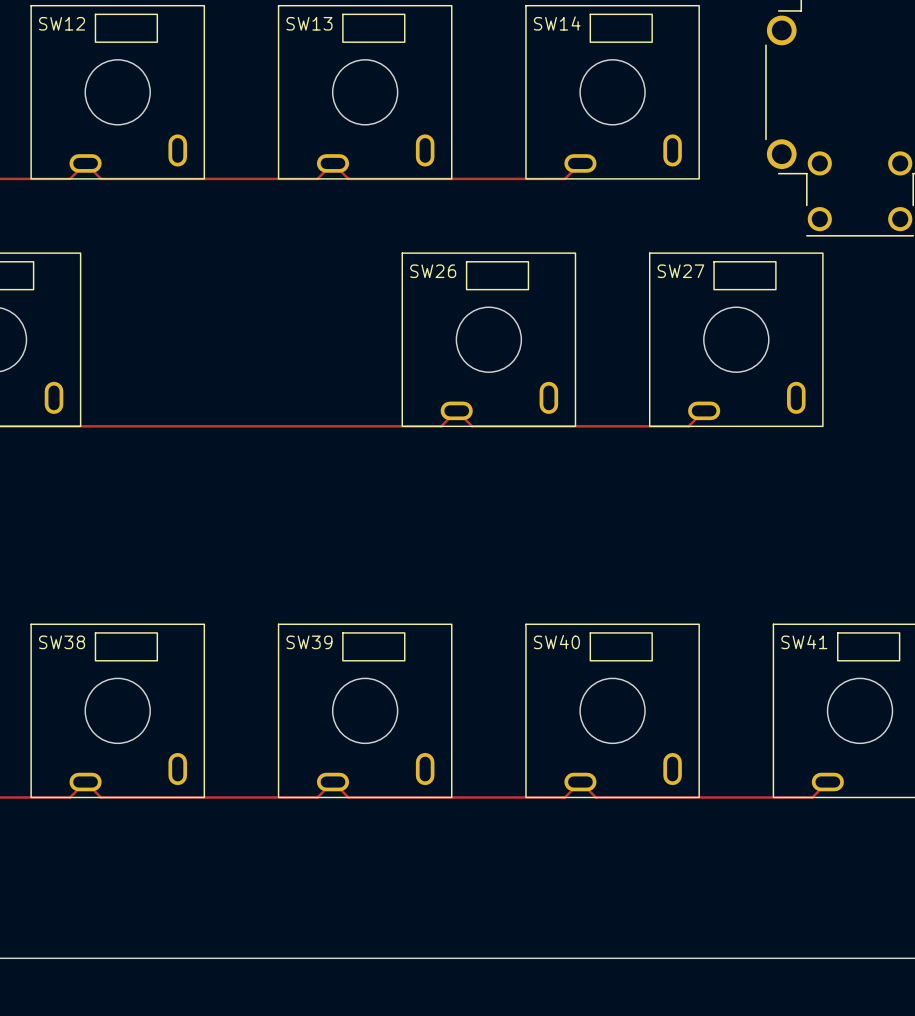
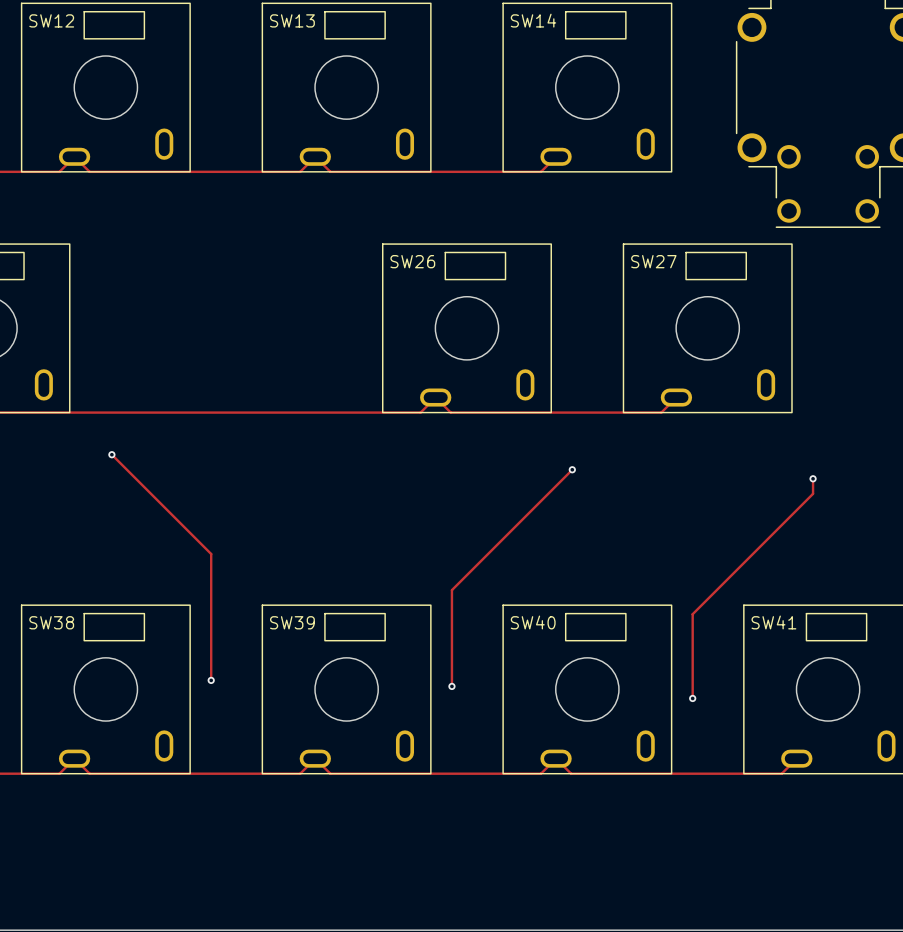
track: none -> (111, 454) (211, 554) (211, 680)
via: none -> (111, 454)
track: none -> (572, 469) (451, 590) (451, 686)
via: none -> (572, 469)
track: none -> (813, 478) (813, 493) (692, 614) (692, 698)
via: none -> (813, 478)
via: none -> (211, 680)
via: none -> (451, 686)
via: none -> (692, 698)

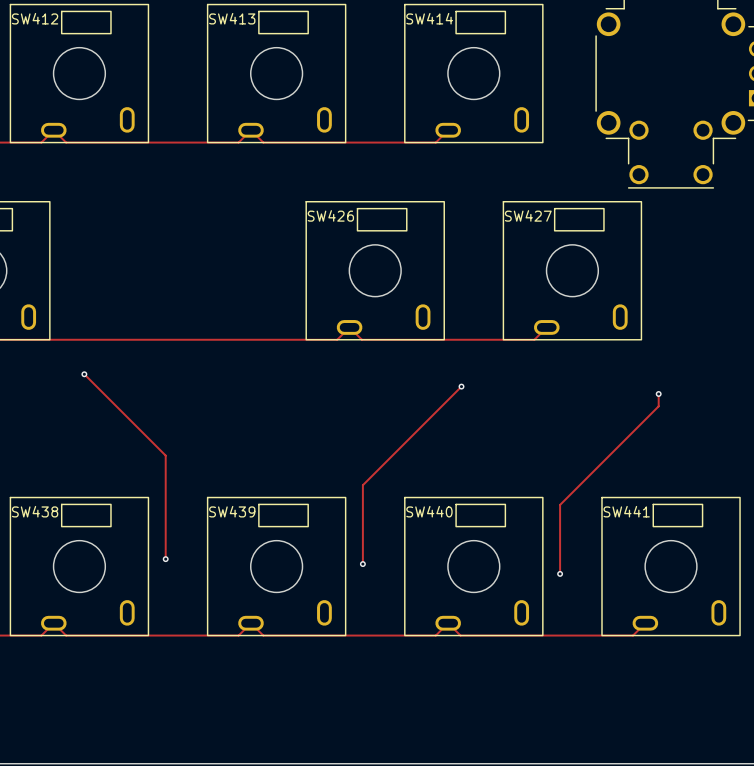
SW12 name: SW12 (51, 20) -> SW412 (35, 18)
SW13 name: SW13 (292, 20) -> SW413 (232, 18)
SW14 name: SW14 (533, 20) -> SW414 (429, 18)
SW26 name: SW26 (412, 261) -> SW426 (330, 215)
SW27 name: SW27 (653, 261) -> SW427 (528, 215)
SW38 name: SW38 (51, 622) -> SW438 (35, 511)
SW39 name: SW39 (292, 622) -> SW439 (232, 511)
SW40 name: SW40 (533, 622) -> SW440 (429, 511)
SW41 name: SW41 (773, 622) -> SW441 (626, 511)

